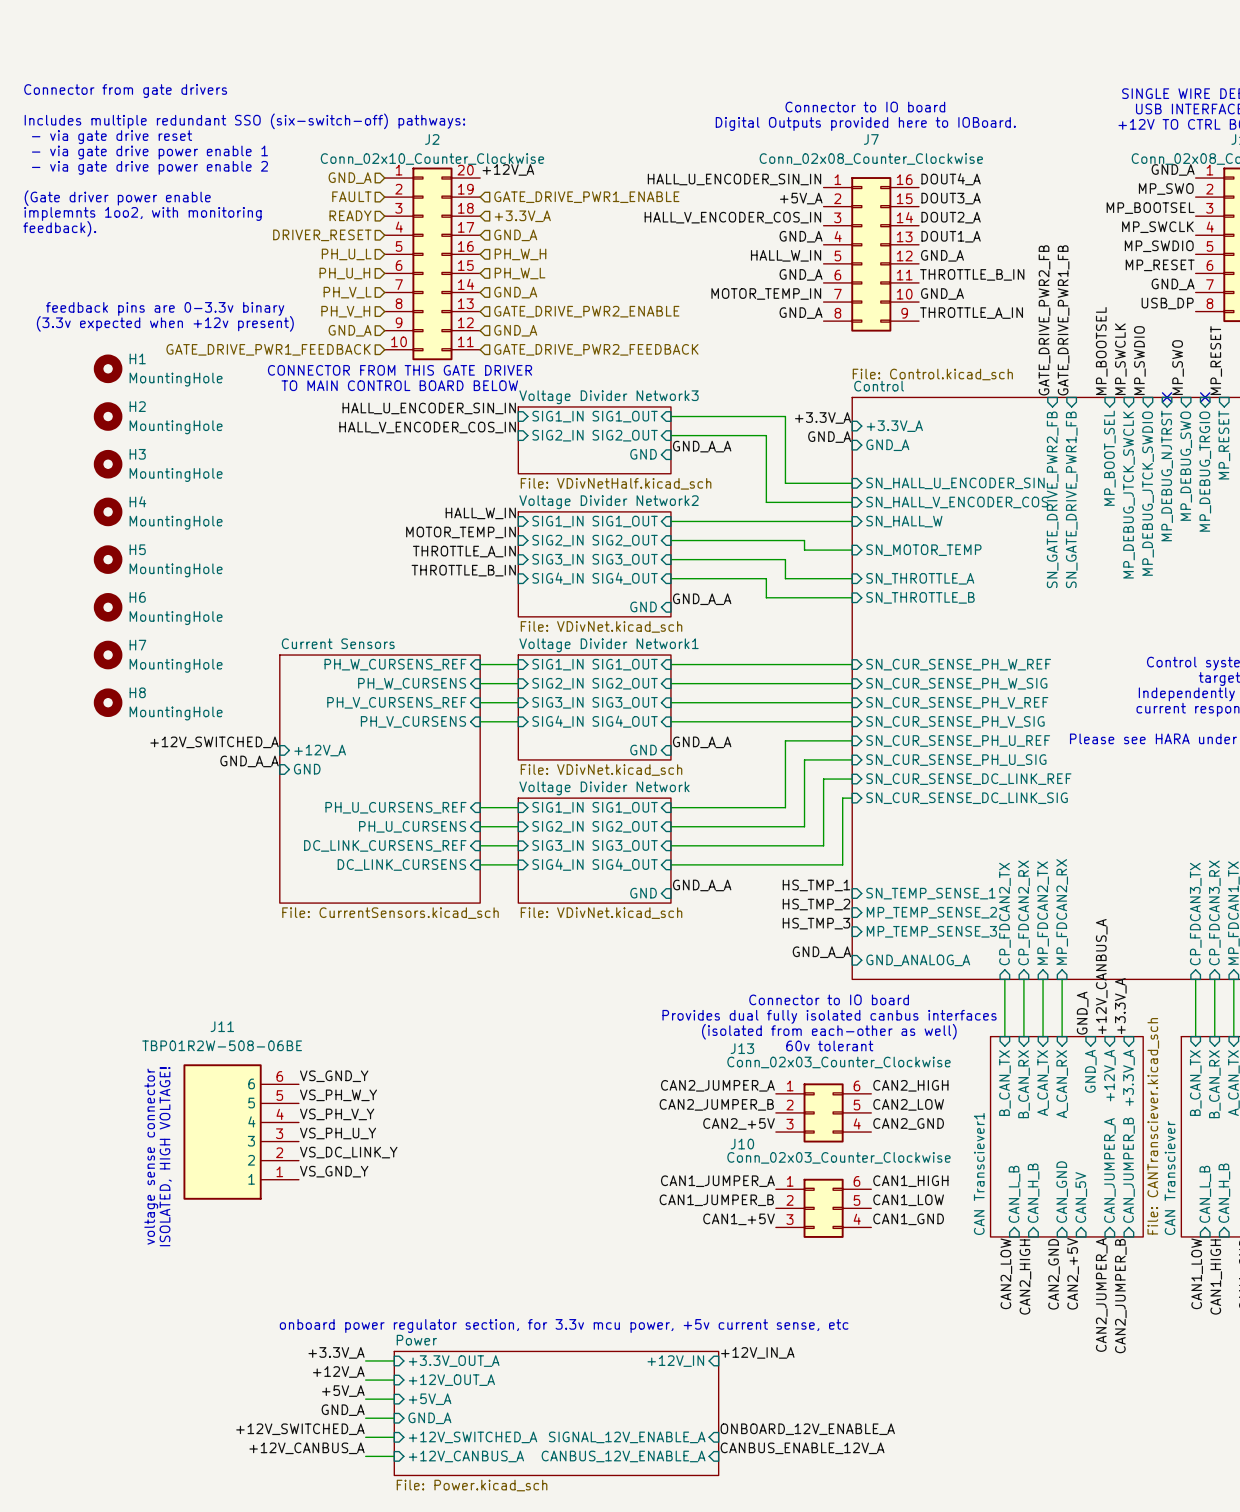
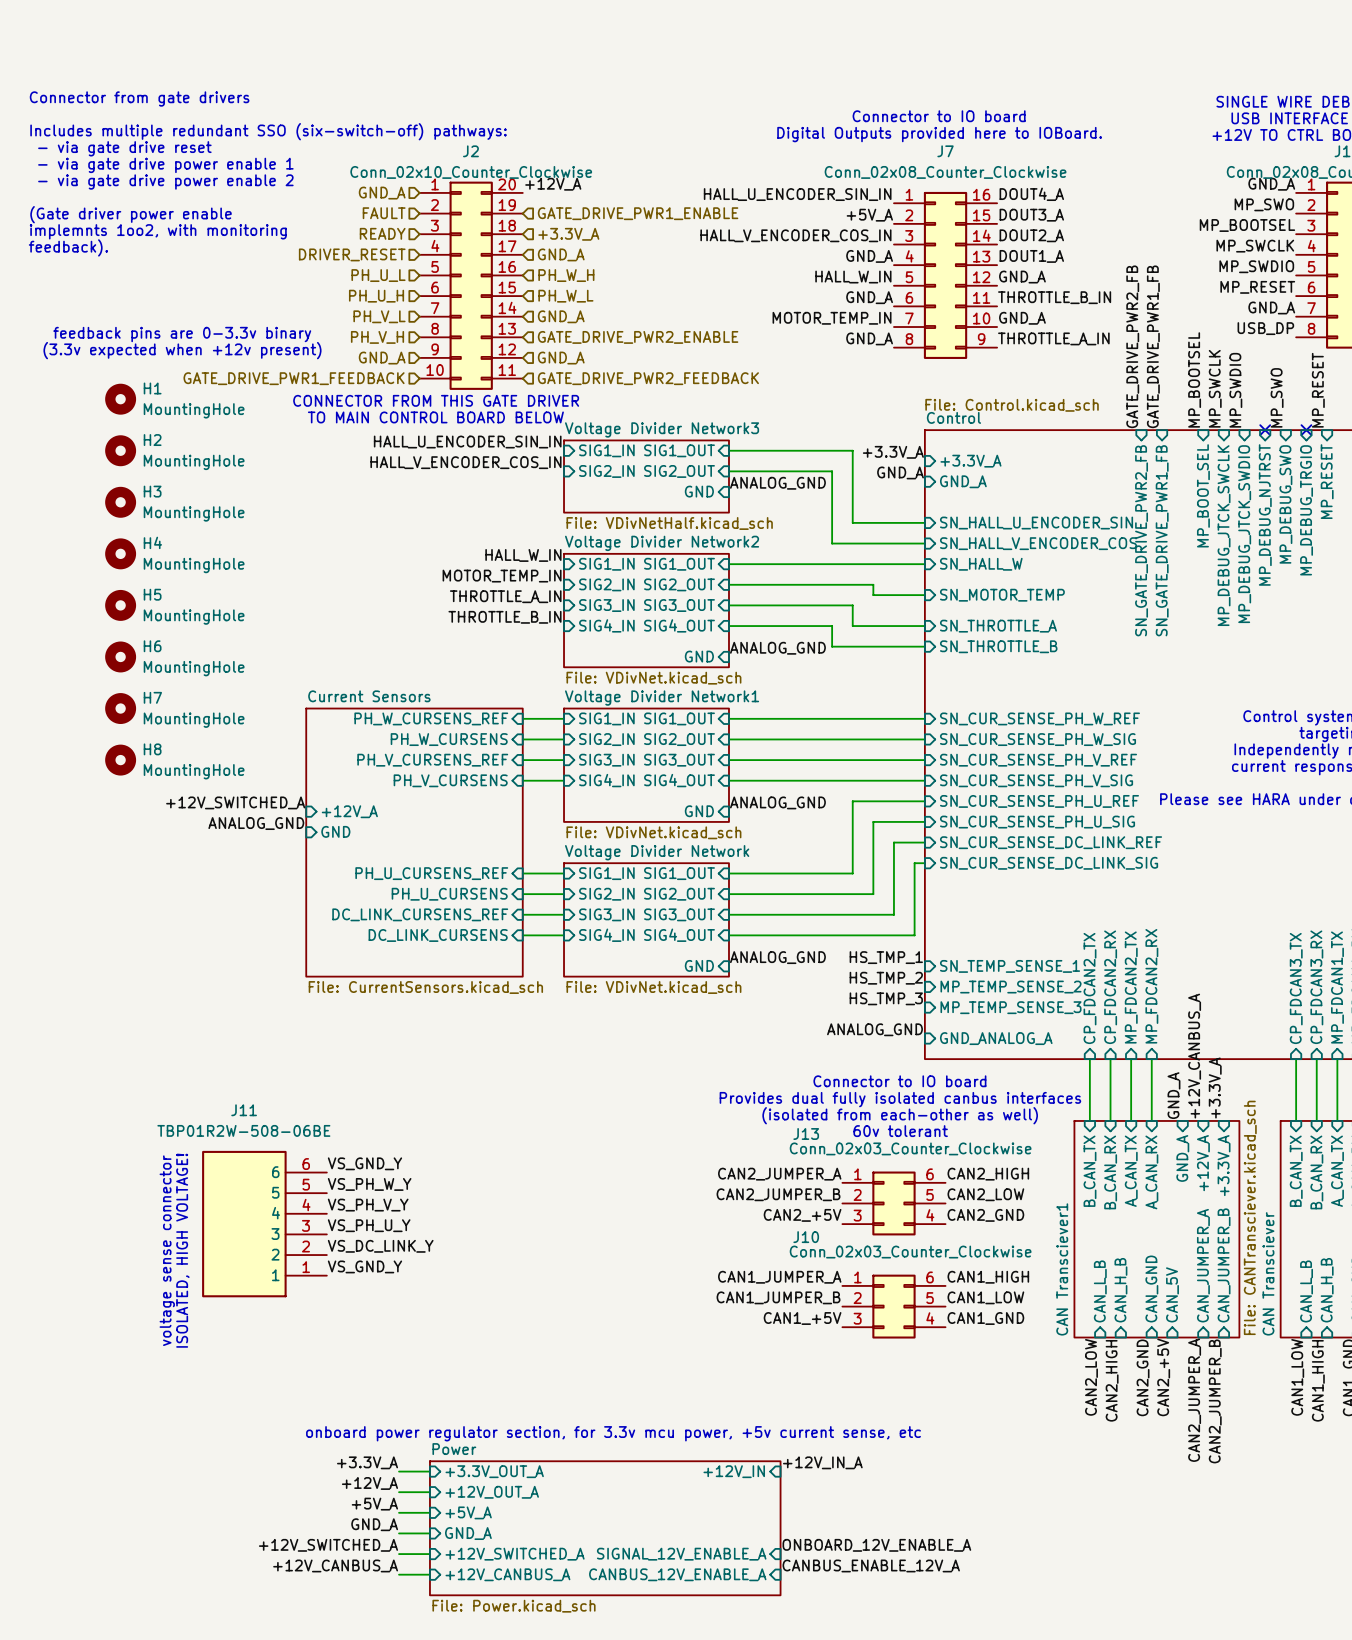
label: GND_A_A (702, 446) -> ANALOG_GND (777, 483)
label: GND_A_A (702, 599) -> ANALOG_GND (777, 648)
label: GND_A_A (702, 742) -> ANALOG_GND (777, 802)
label: GND_A_A (249, 761) -> ANALOG_GND (256, 823)
label: GND_A_A (702, 885) -> ANALOG_GND (777, 957)
label: GND_A_A (821, 952) -> ANALOG_GND (874, 1029)

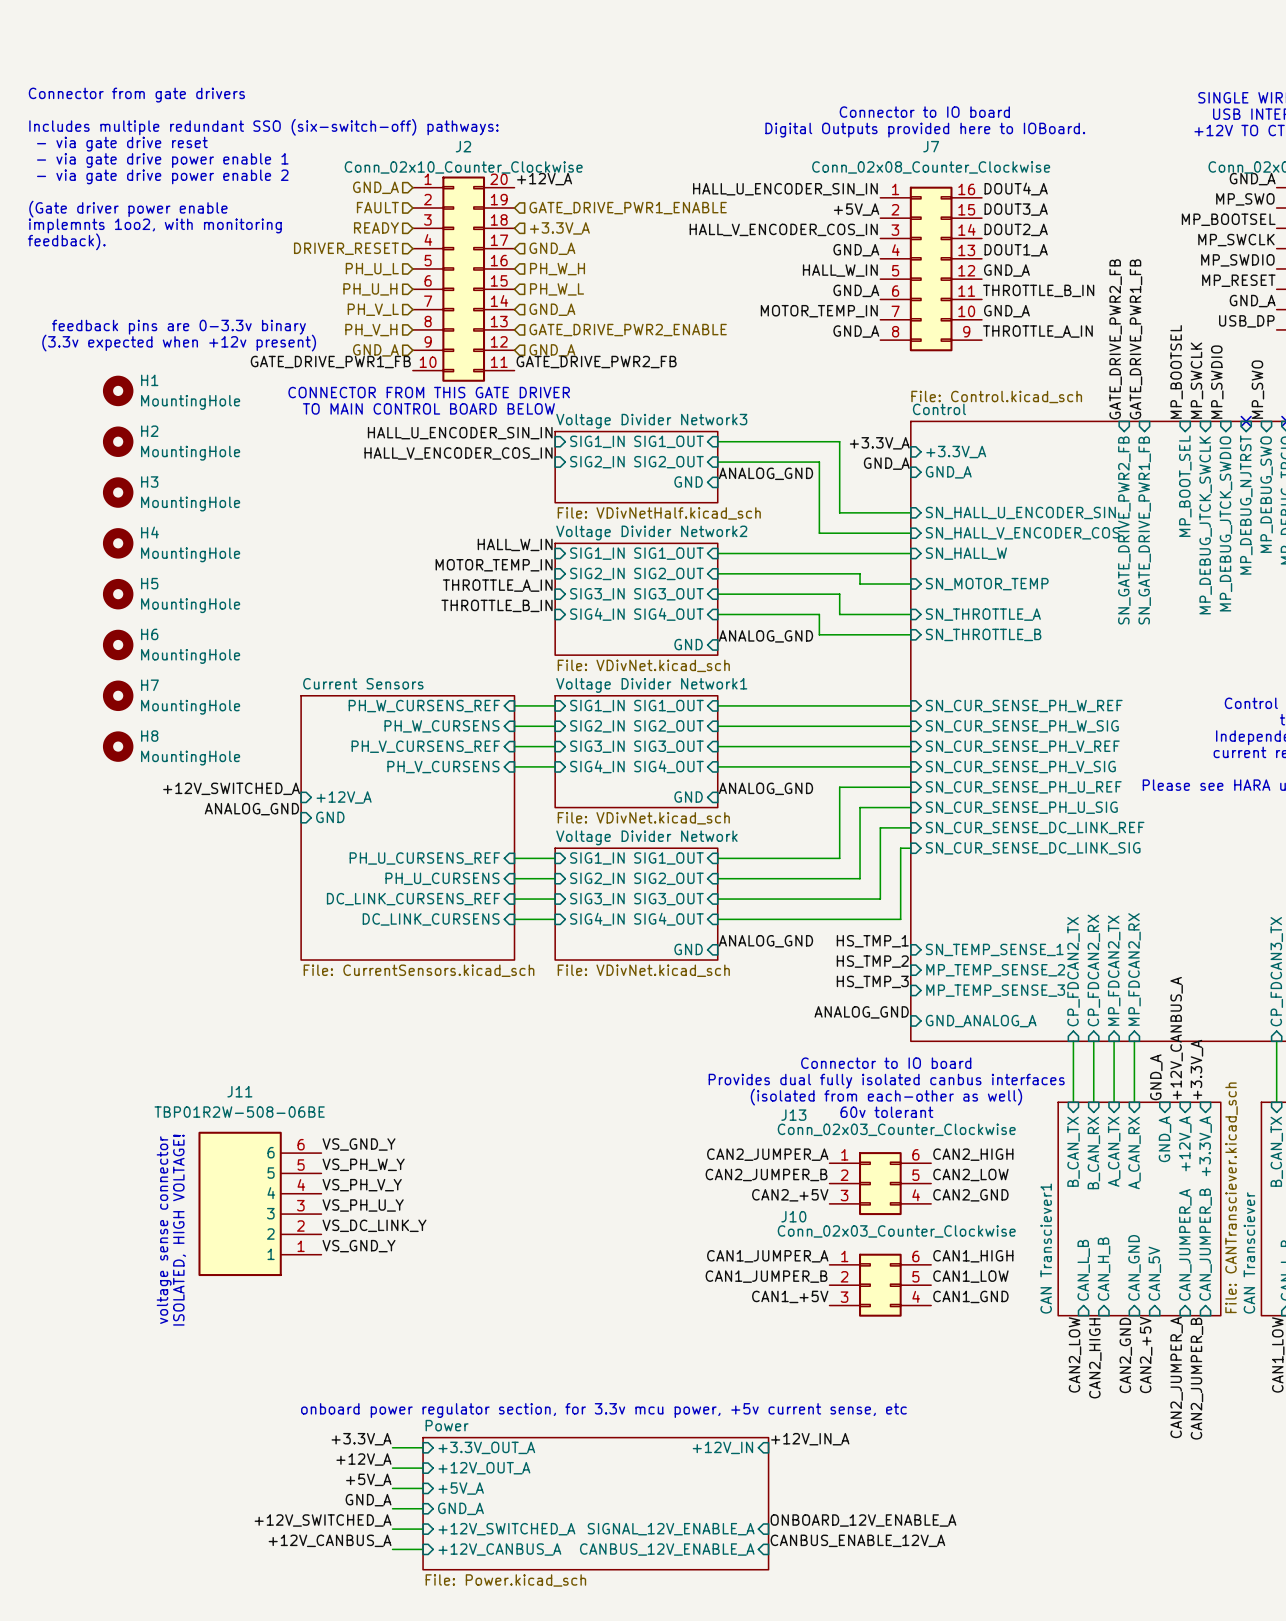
label: none -> GATE_DRIVE_PWR1_FB (330, 362)
label: none -> GATE_DRIVE_PWR2_FB (596, 362)
hierarchical label: GATE_DRIVE_PWR1_FEEDBACK (294, 378) -> none
hierarchical label: GATE_DRIVE_PWR2_FEEDBACK (648, 378) -> none

